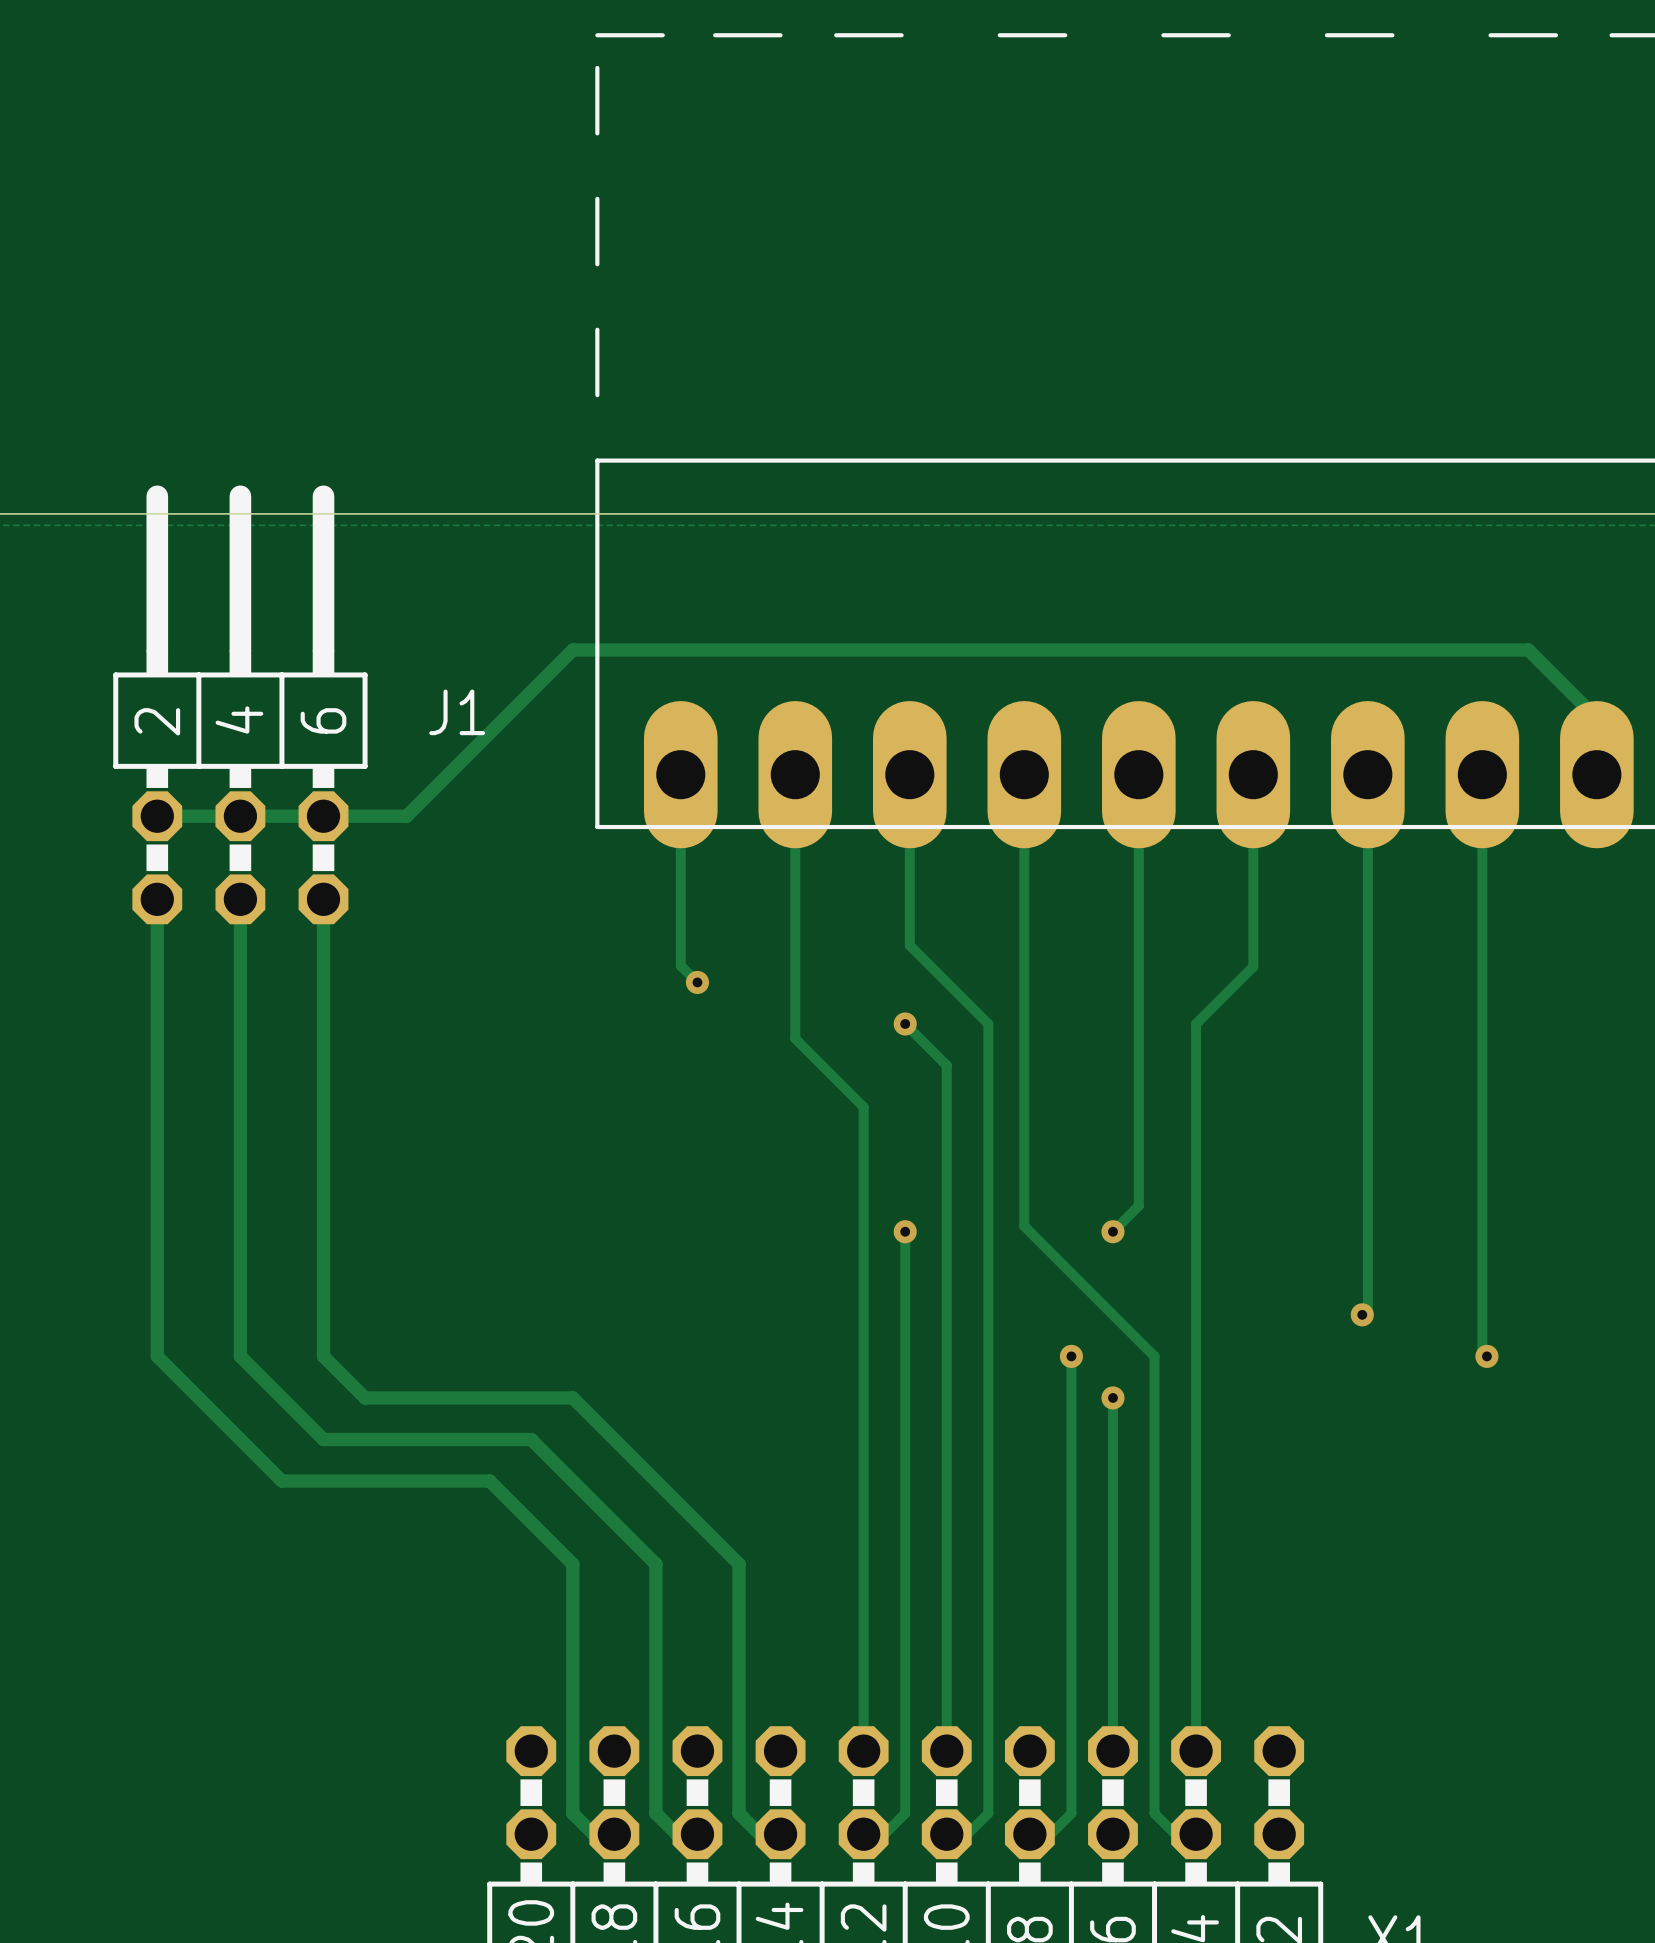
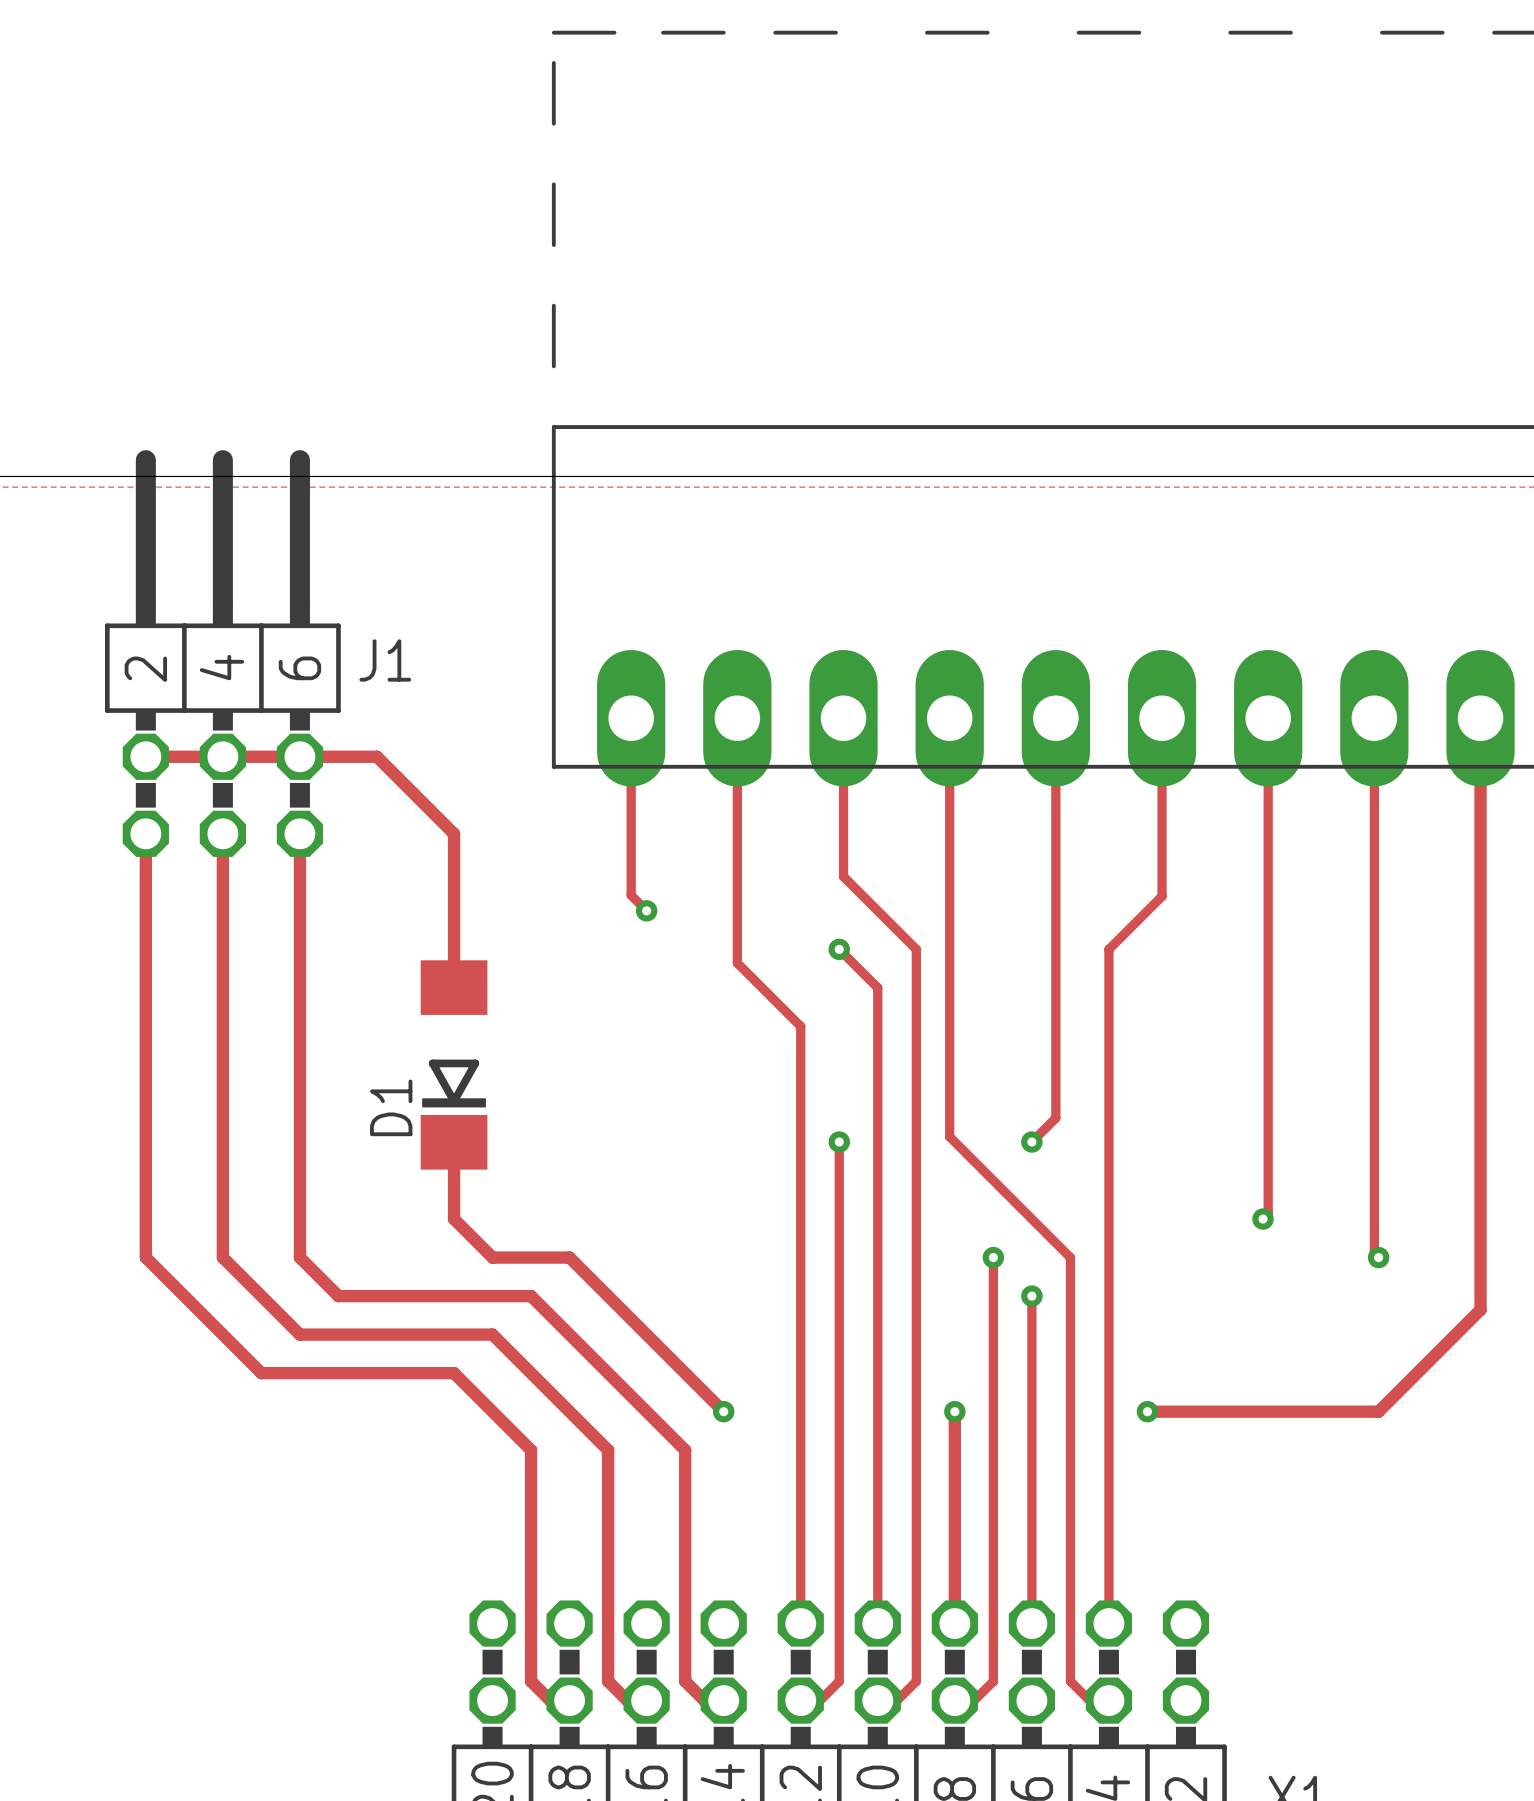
J1 name position: J1 (457, 712) -> J1 (385, 660)
track: (1596, 774) (1596, 718) (1528, 650) (572, 650) (406, 816) -> (1480, 718) (1480, 1309) (1378, 1411) (1147, 1411)
track: none -> (376, 756) (454, 833) (454, 987)
D1: none -> (454, 1064)
track: none -> (454, 1142) (454, 1219) (492, 1257) (569, 1257) (723, 1411)
via: none -> (723, 1411)
track: none -> (954, 1411) (954, 1623)
via: none -> (954, 1411)
via: none -> (1147, 1411)

